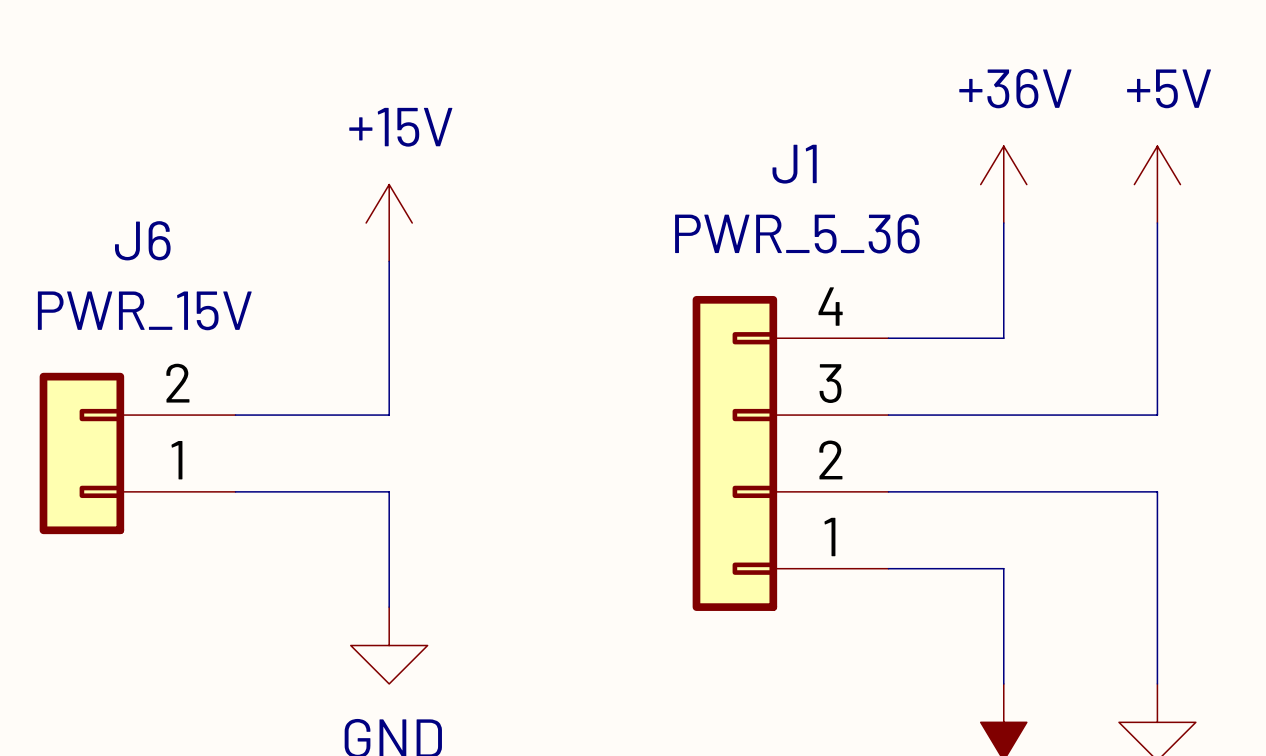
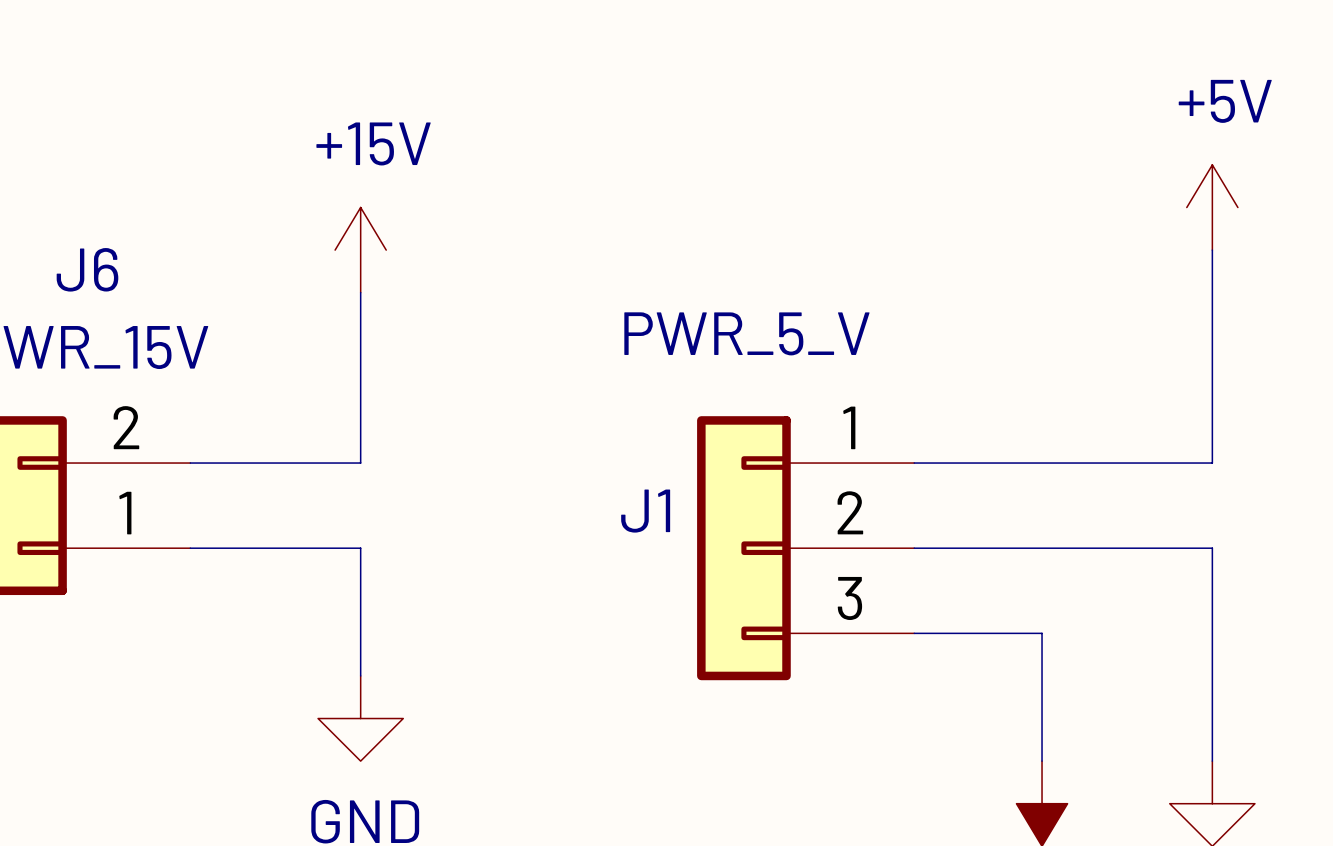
J1 name position: J1 (794, 164) -> J1 (645, 511)
power symbol: +36V (1003, 184) -> none
wire: (1003, 223) (1003, 338) (888, 338) -> none
J1 value: PWR_5_36 (797, 233) -> PWR_5_V (747, 333)
J1 symbol: [692, 295, 889, 611] -> [697, 416, 915, 681]

